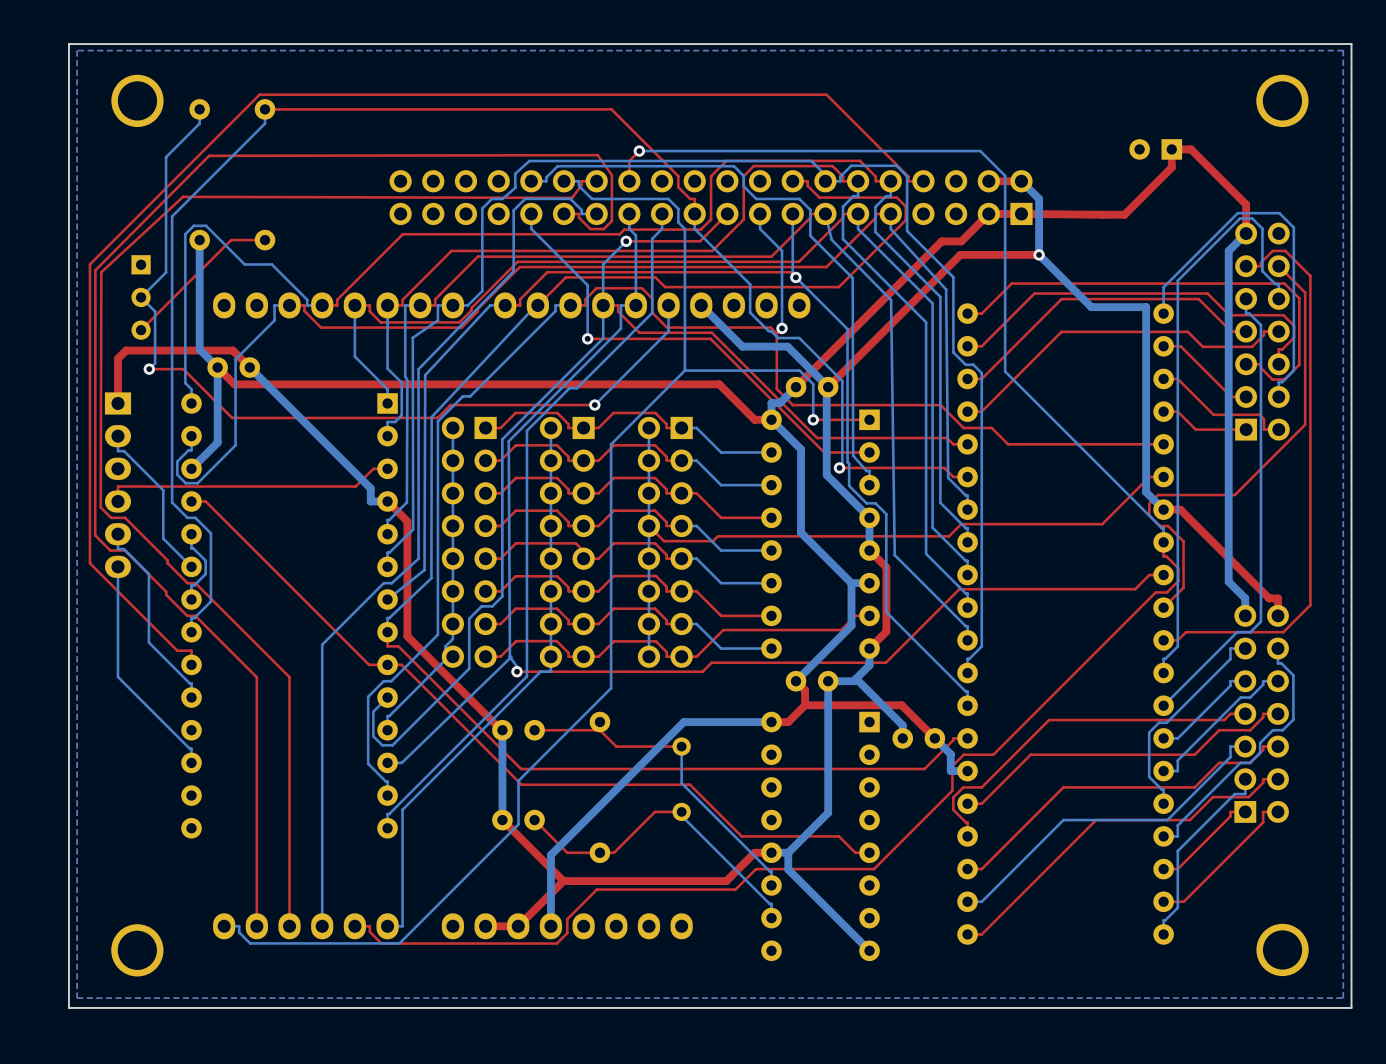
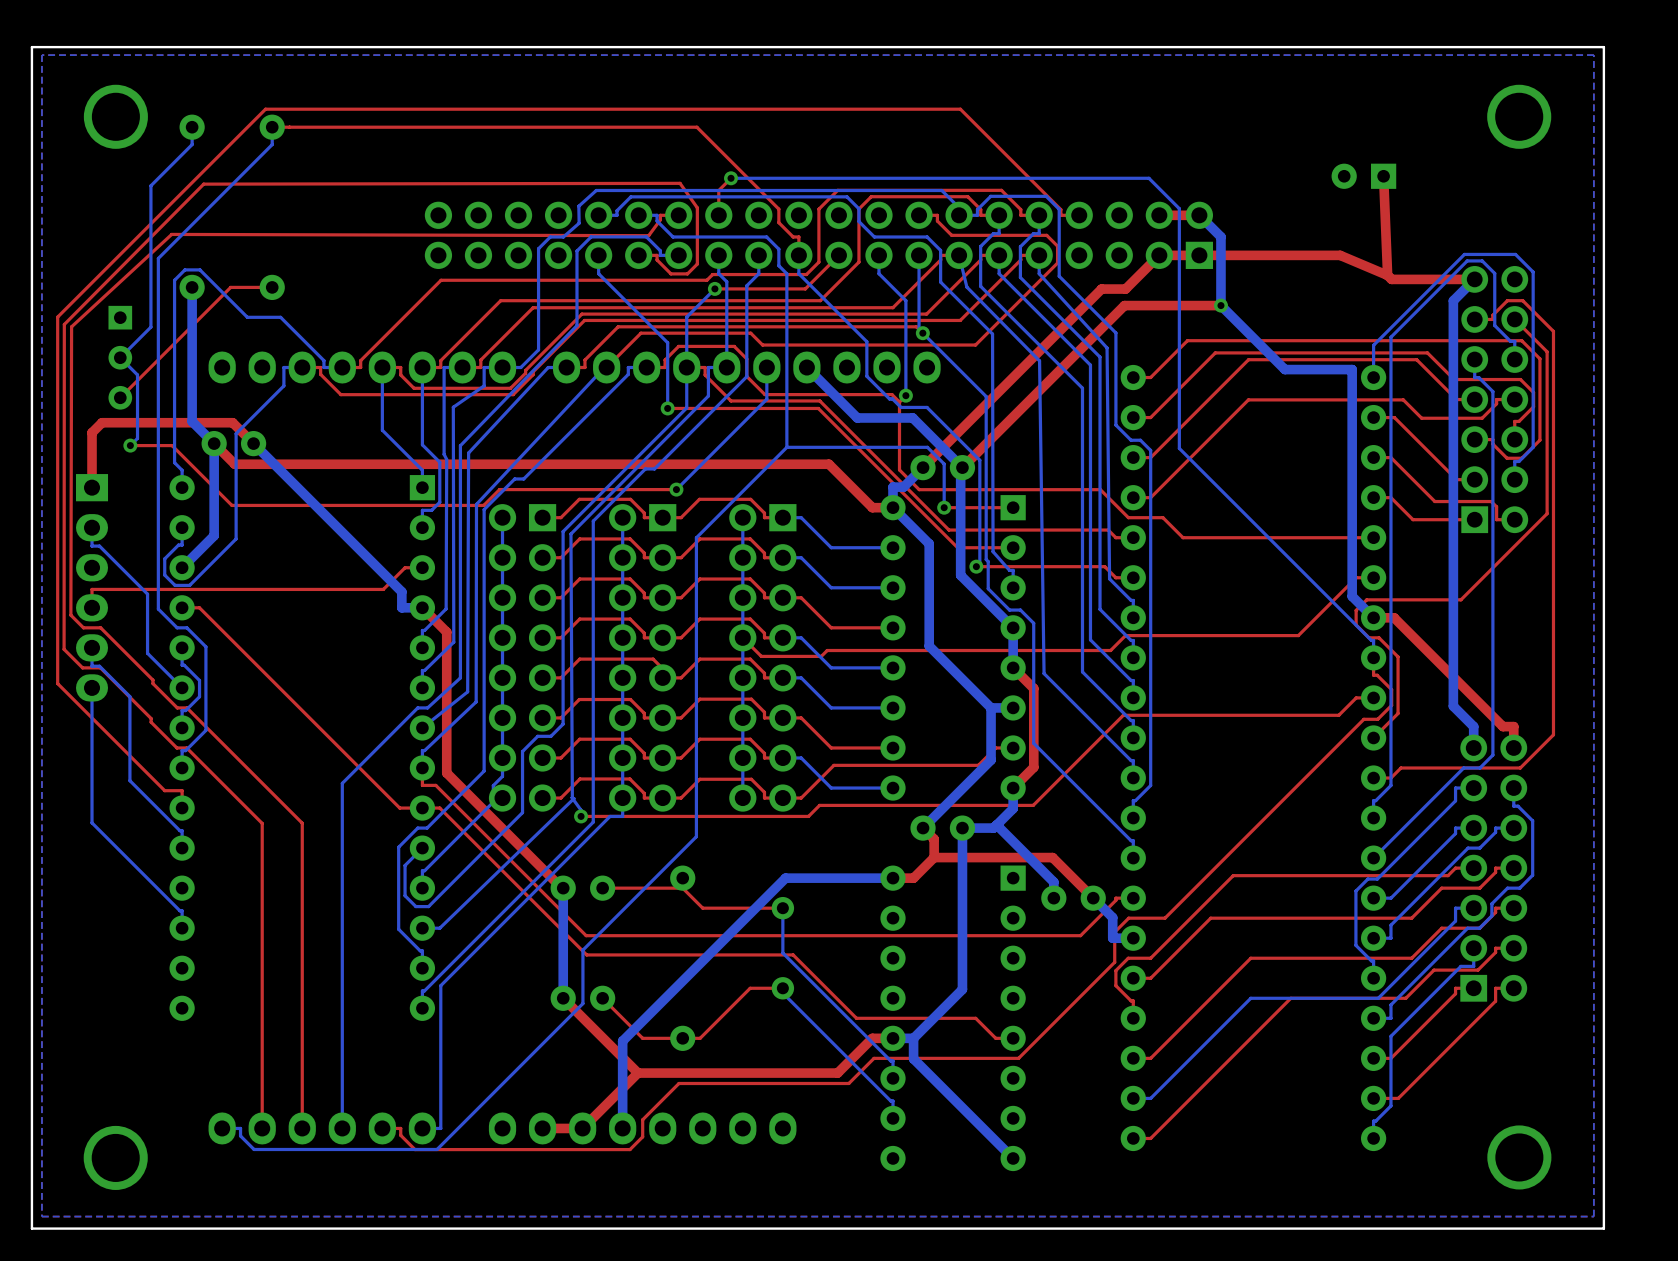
top track: none -> (1383, 176) (1387, 275)
top track: (1021, 213) (1124, 214) (1171, 167) (1171, 149) (1191, 149) (1246, 204) (1246, 233) -> (1199, 255) (1340, 255) (1387, 275)
top track: none -> (1387, 275) (1391, 279) (1474, 279)

